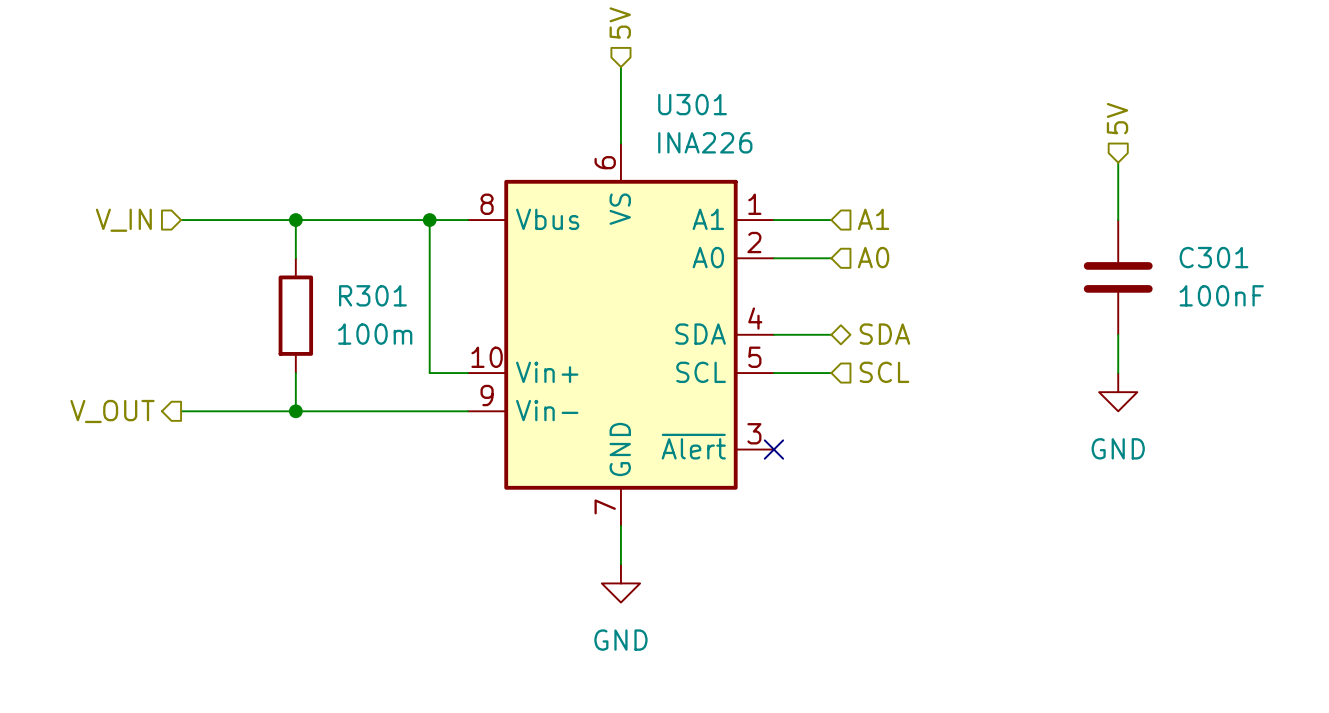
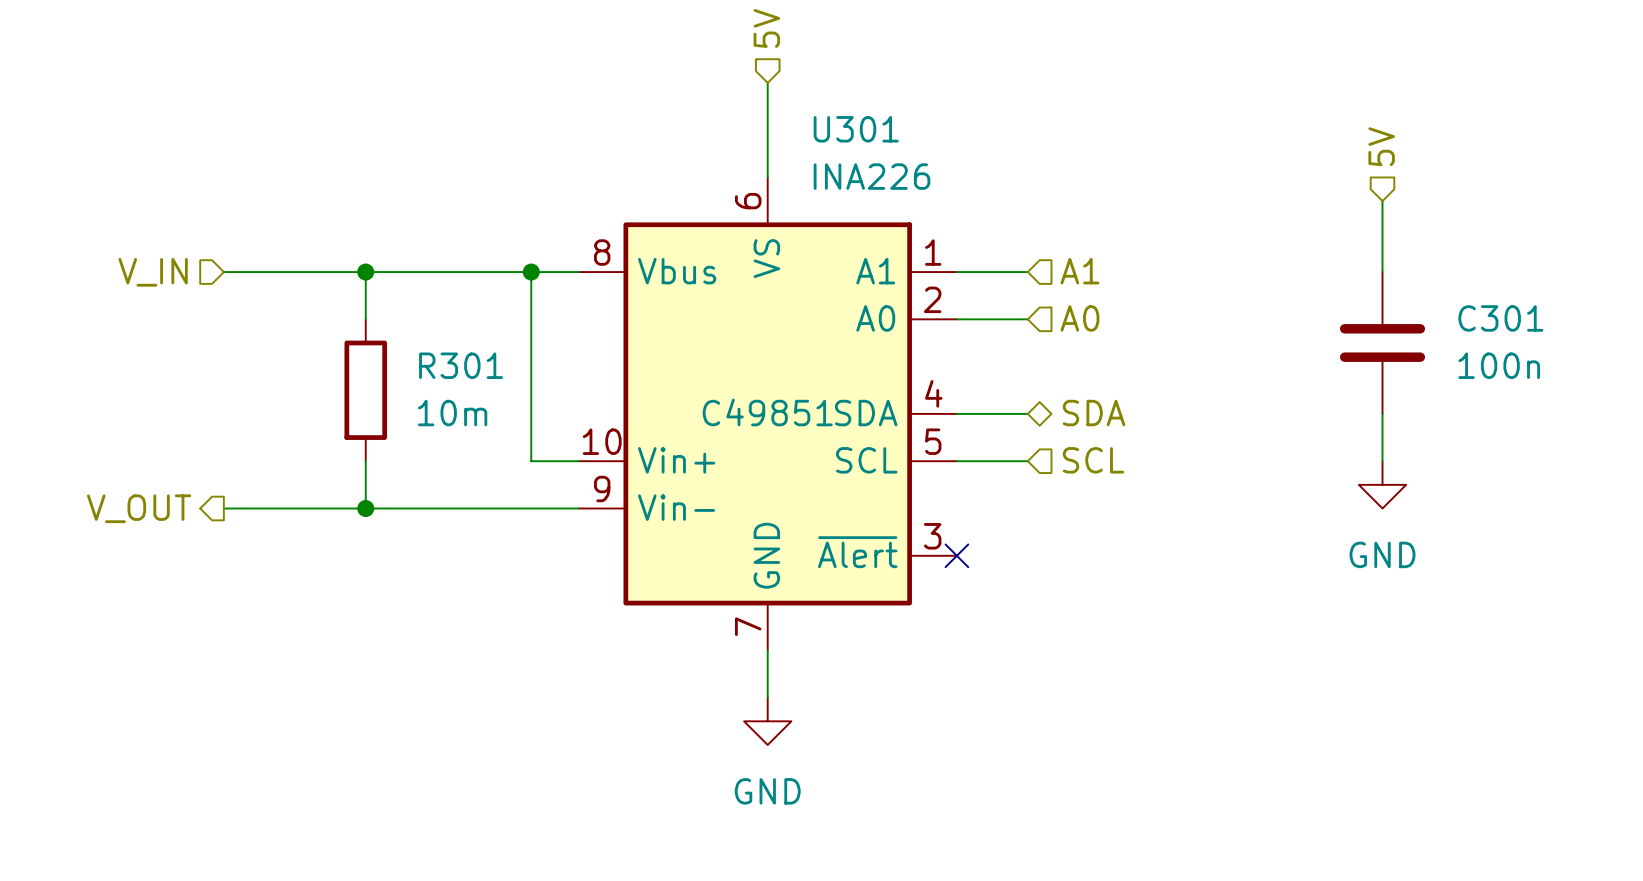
C301 value: 100nF (1221, 295) -> 100n (1499, 365)
U301 text: none -> C49851 (767, 412)
R301 value: 100m (375, 334) -> 10m (452, 413)

